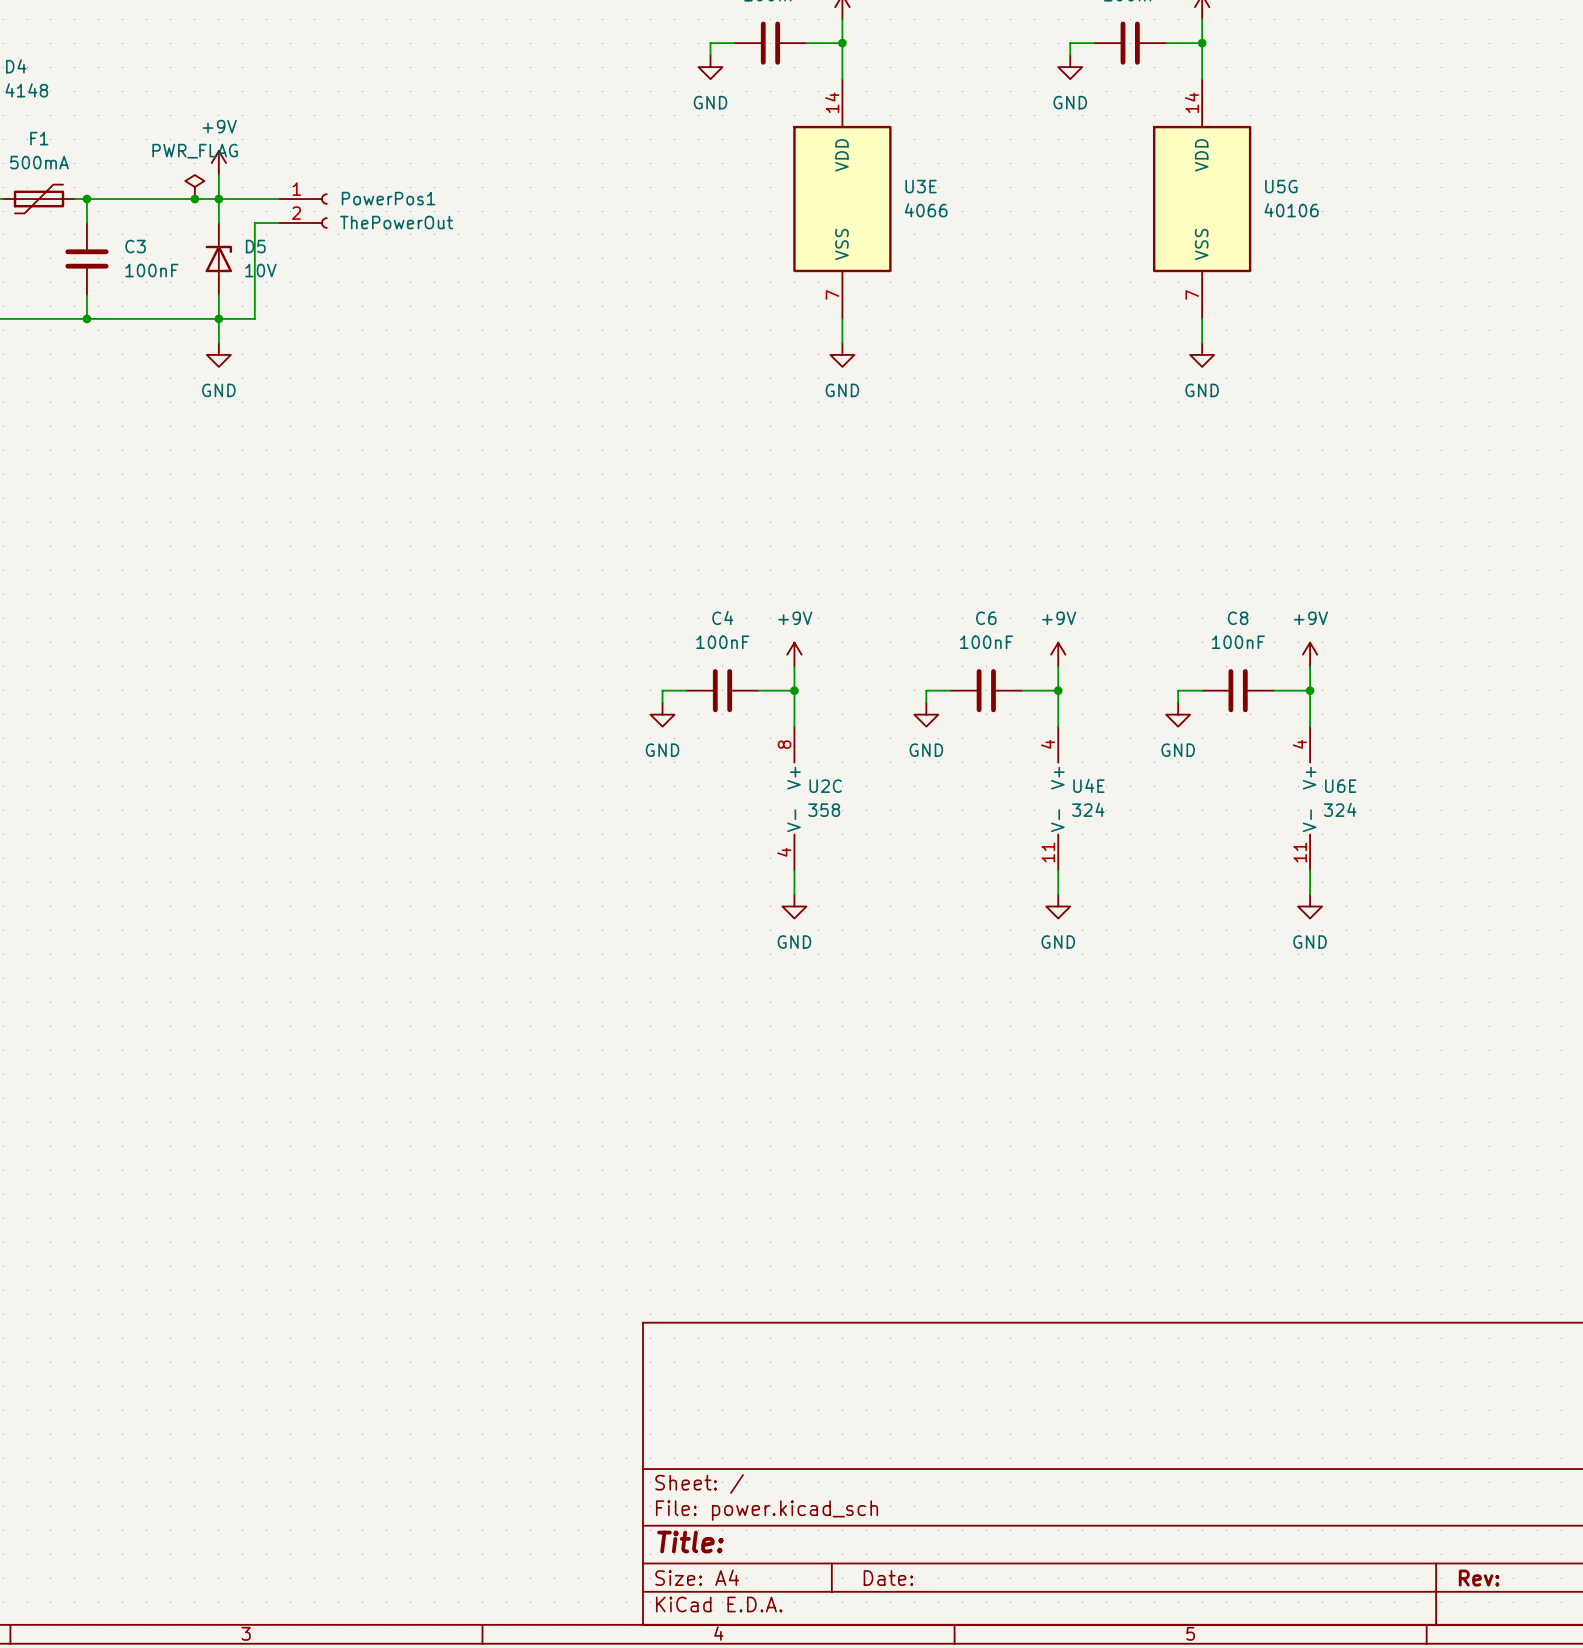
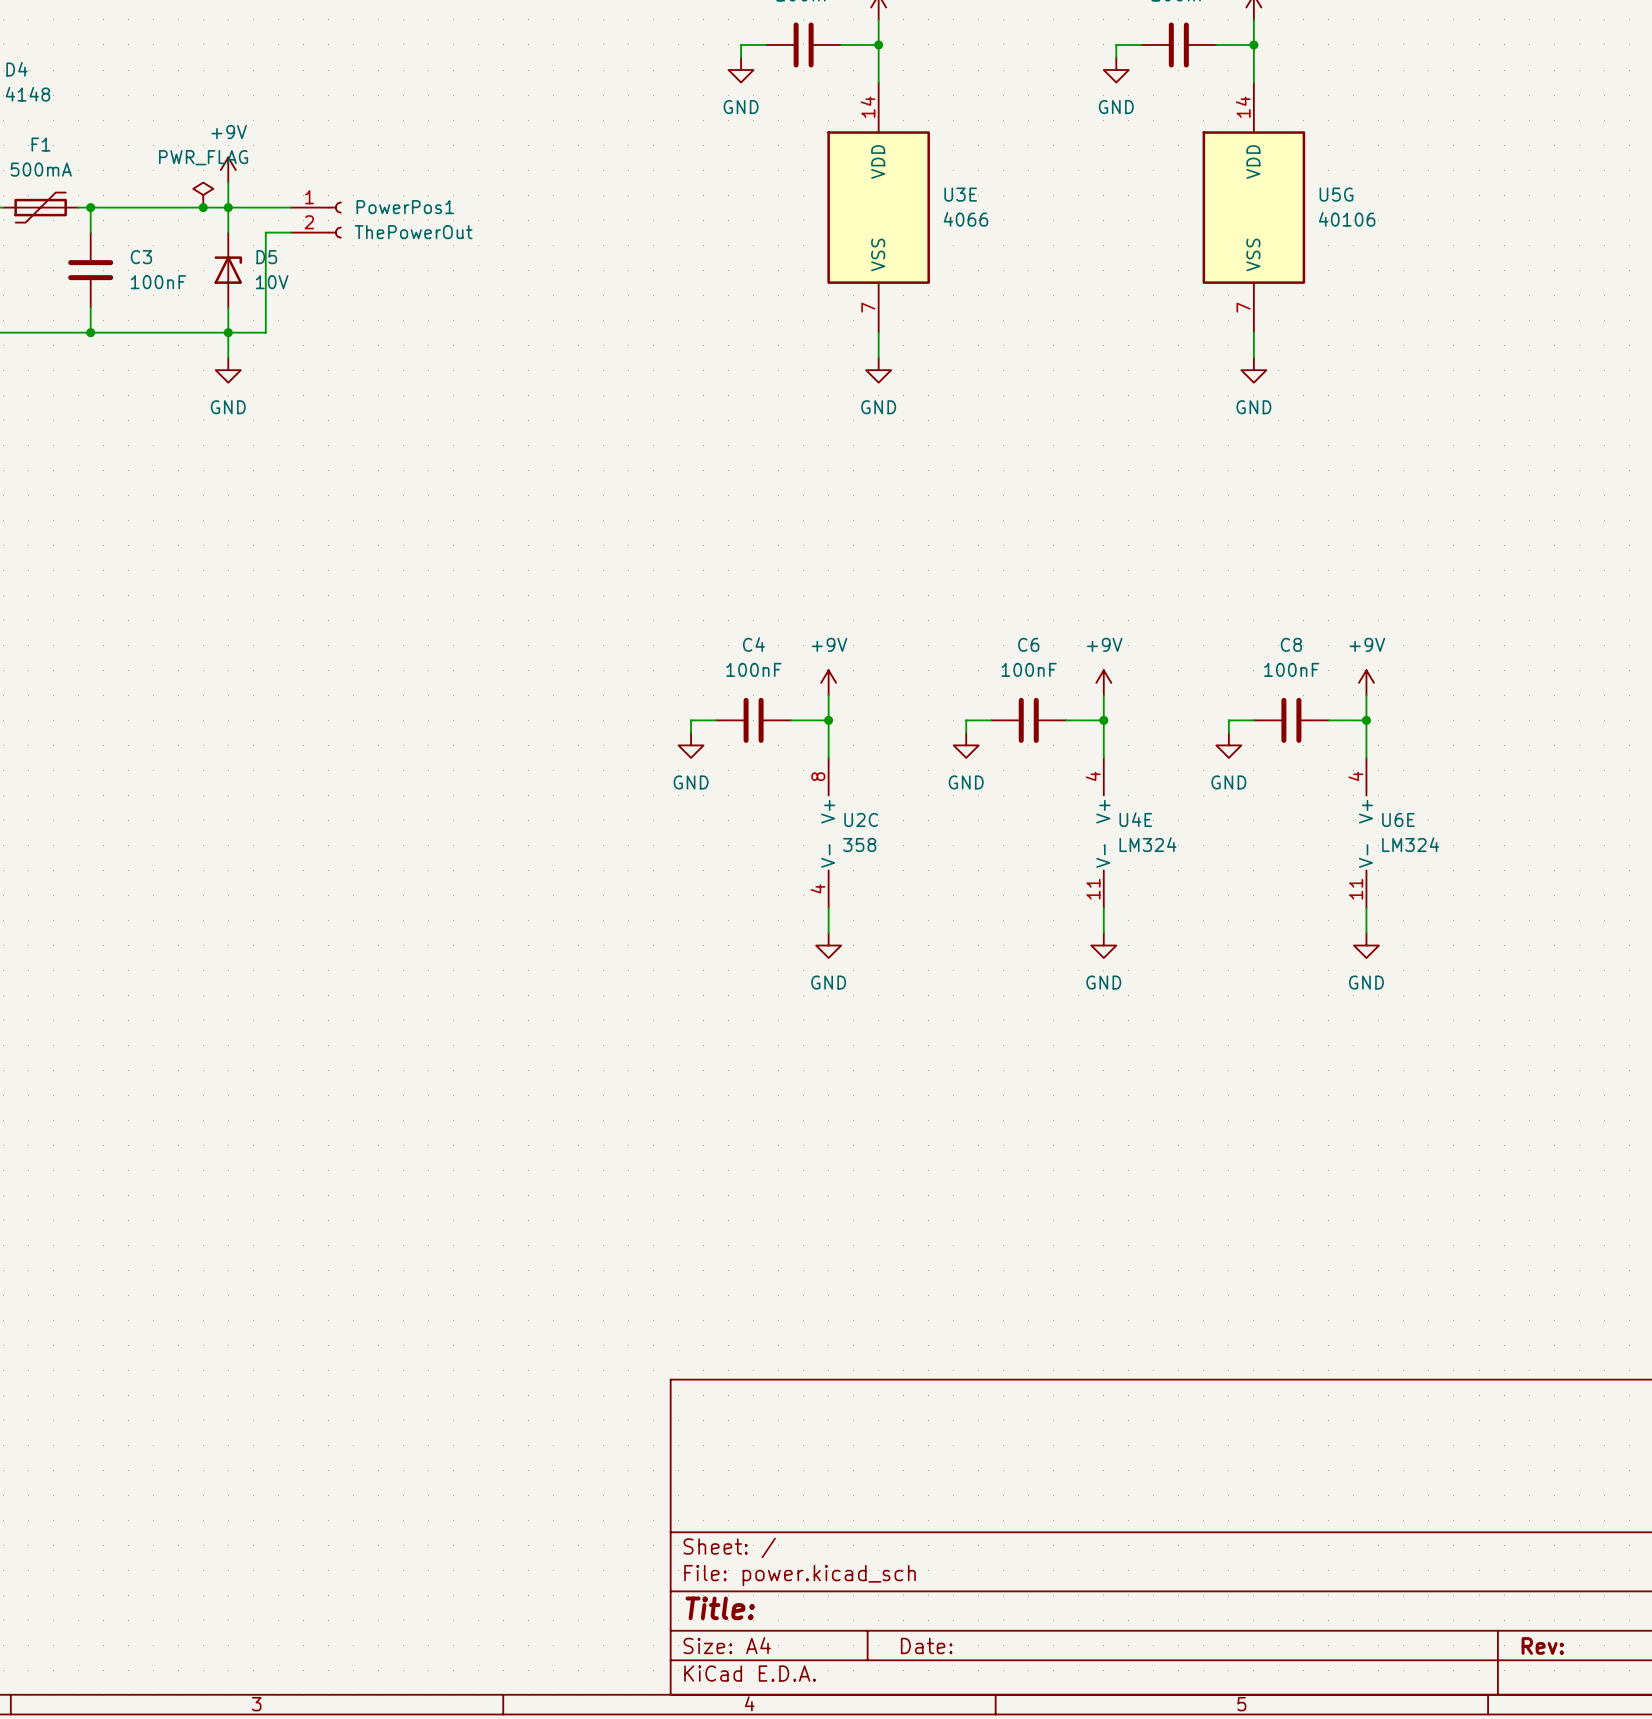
U4E value: 324 (1088, 809) -> LM324 (1147, 844)
U6E value: 324 (1340, 809) -> LM324 (1410, 844)

